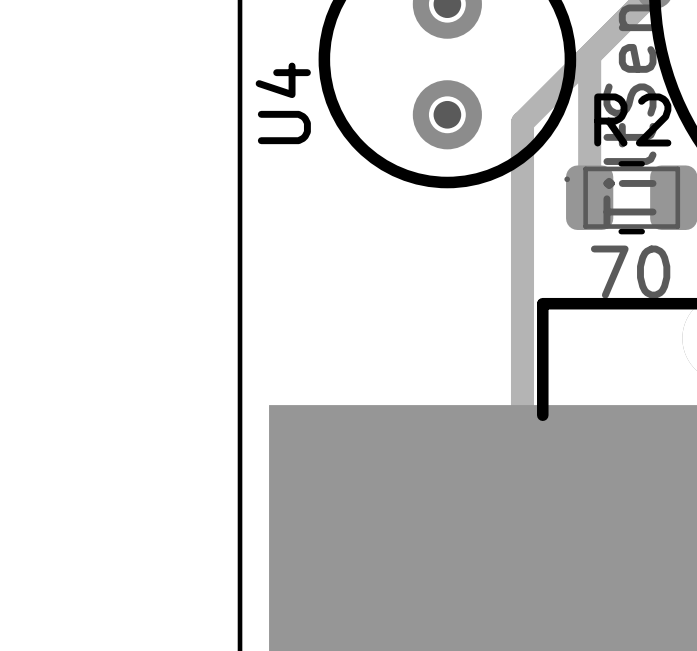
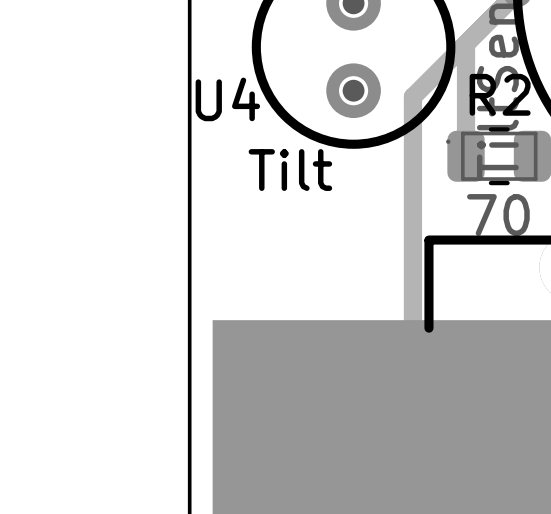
U4 name rotation: 0° (283, 103) -> 90° clockwise (227, 99)
text: none -> Tilt (290, 170)

